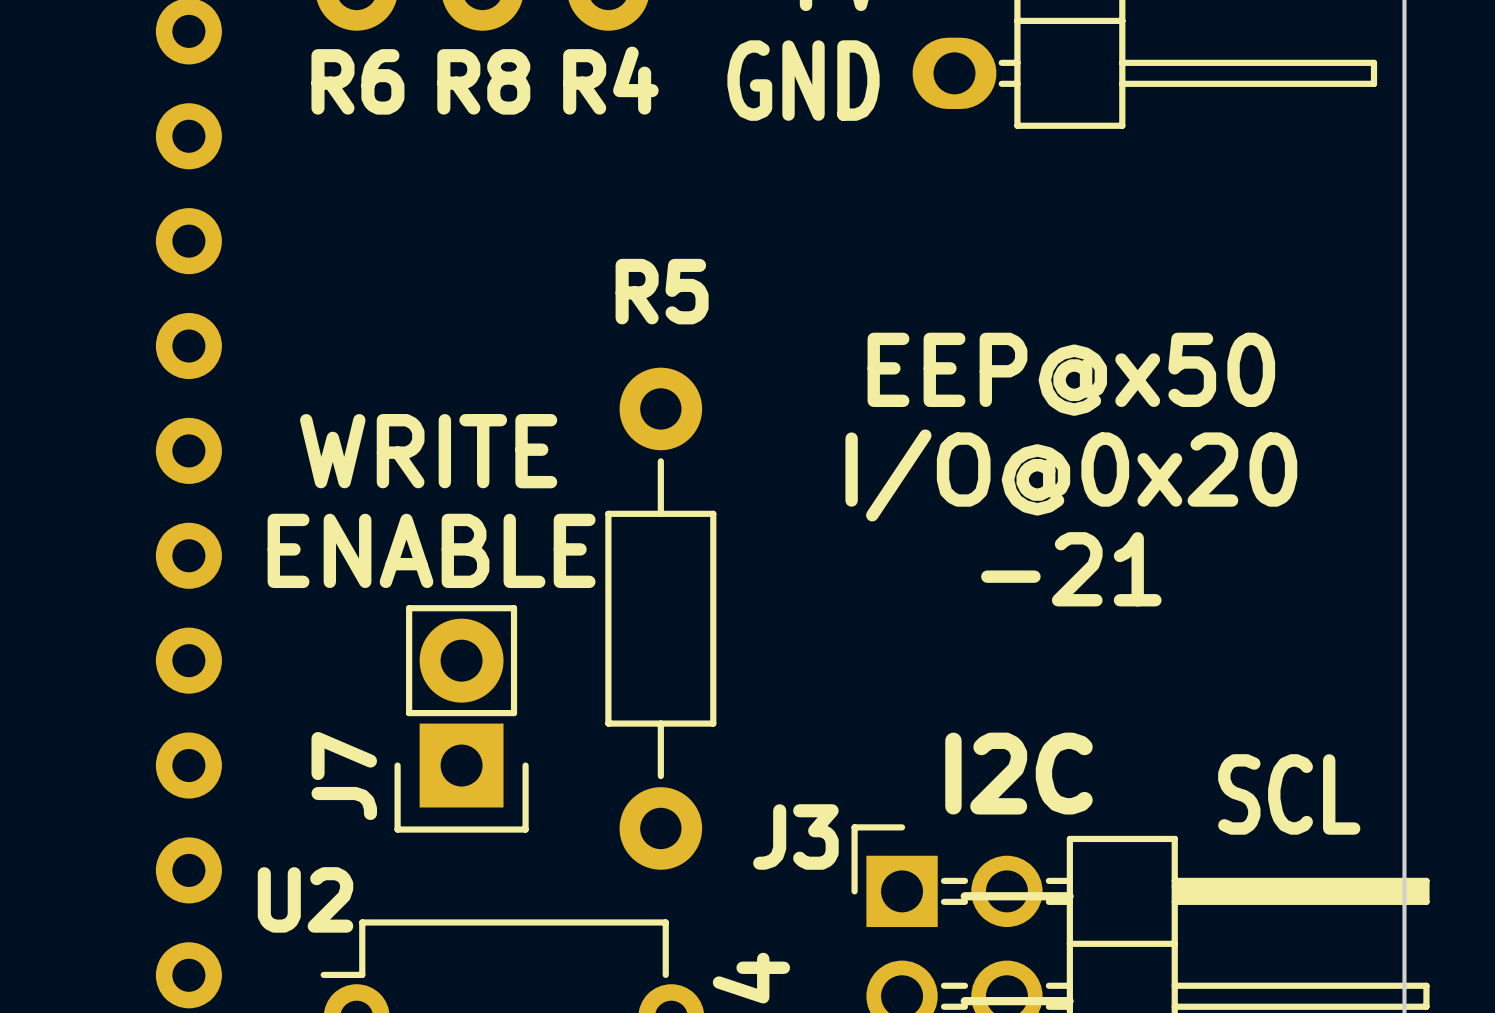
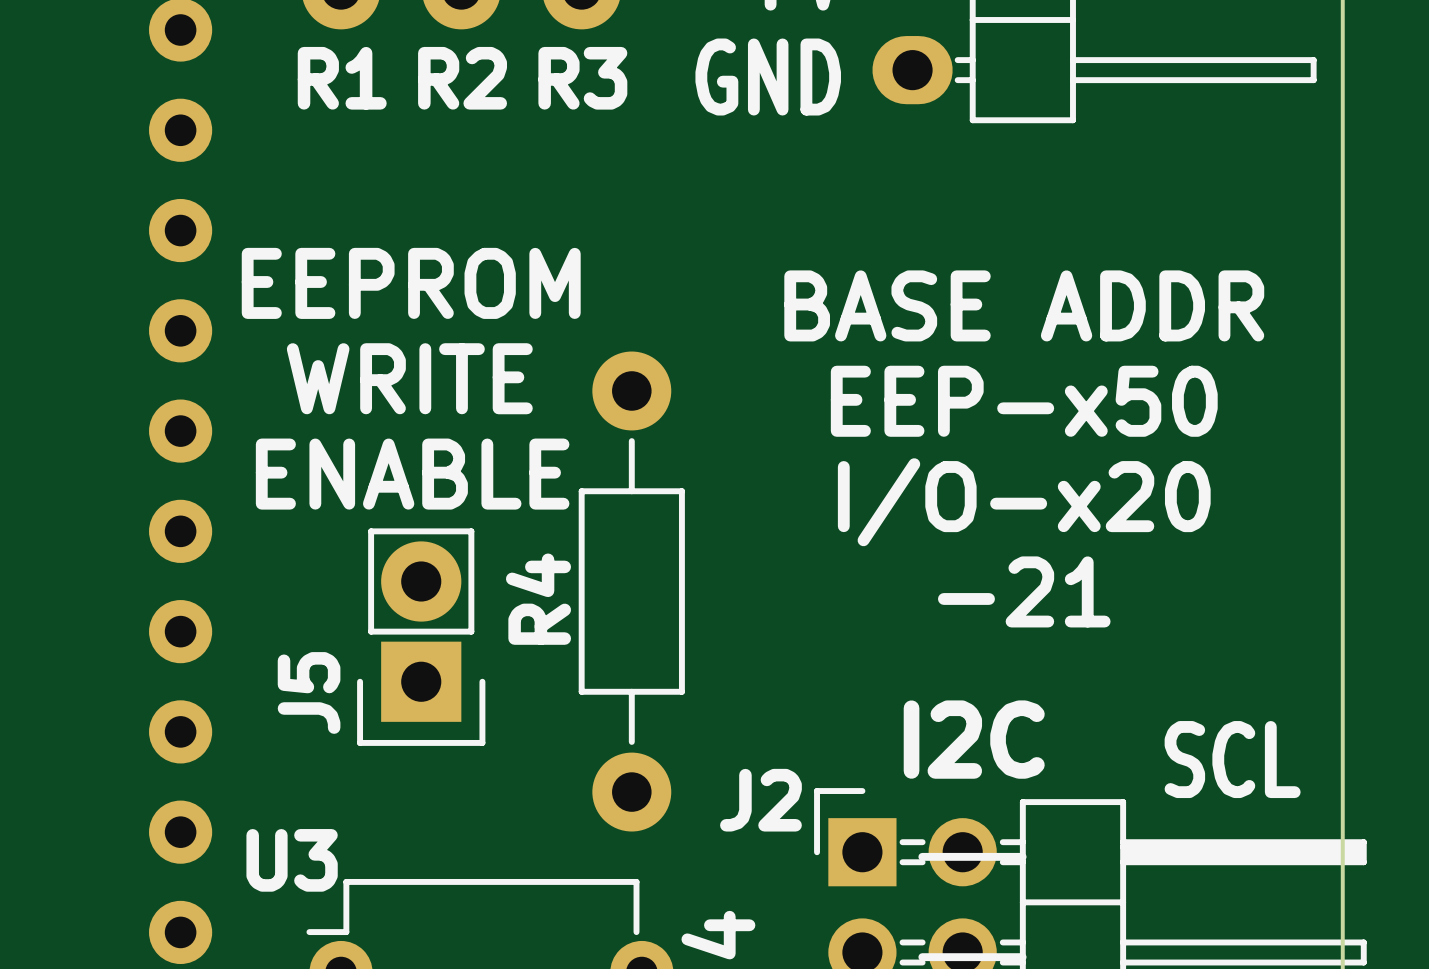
R4 name: R4 (610, 80) -> R3 (582, 78)
R6 name: R6 (357, 81) -> R1 (342, 78)
R8 name: R8 (483, 81) -> R2 (462, 78)
R5 name: R5 (662, 291) -> R4 (538, 599)
text: none -> EEPROM (411, 283)
text: none -> BASE ADDR (1024, 305)
text: EEP@x50 (1071, 374) -> EEP-x50 (1024, 401)
text position: WRITE (428, 451) -> WRITE (409, 378)
text: I/O@0x20 (1071, 475) -> I/O-x20 (1024, 502)
text position: ENABLE (431, 550) -> ENABLE (412, 474)
text position: -21 (1071, 569) -> -21 (1024, 591)
J5: none -> (421, 637)
J7: (461, 718) -> none
J3 name: J3 (795, 836) -> J2 (760, 800)
U2 name: U2 (305, 899) -> U3 (292, 860)

